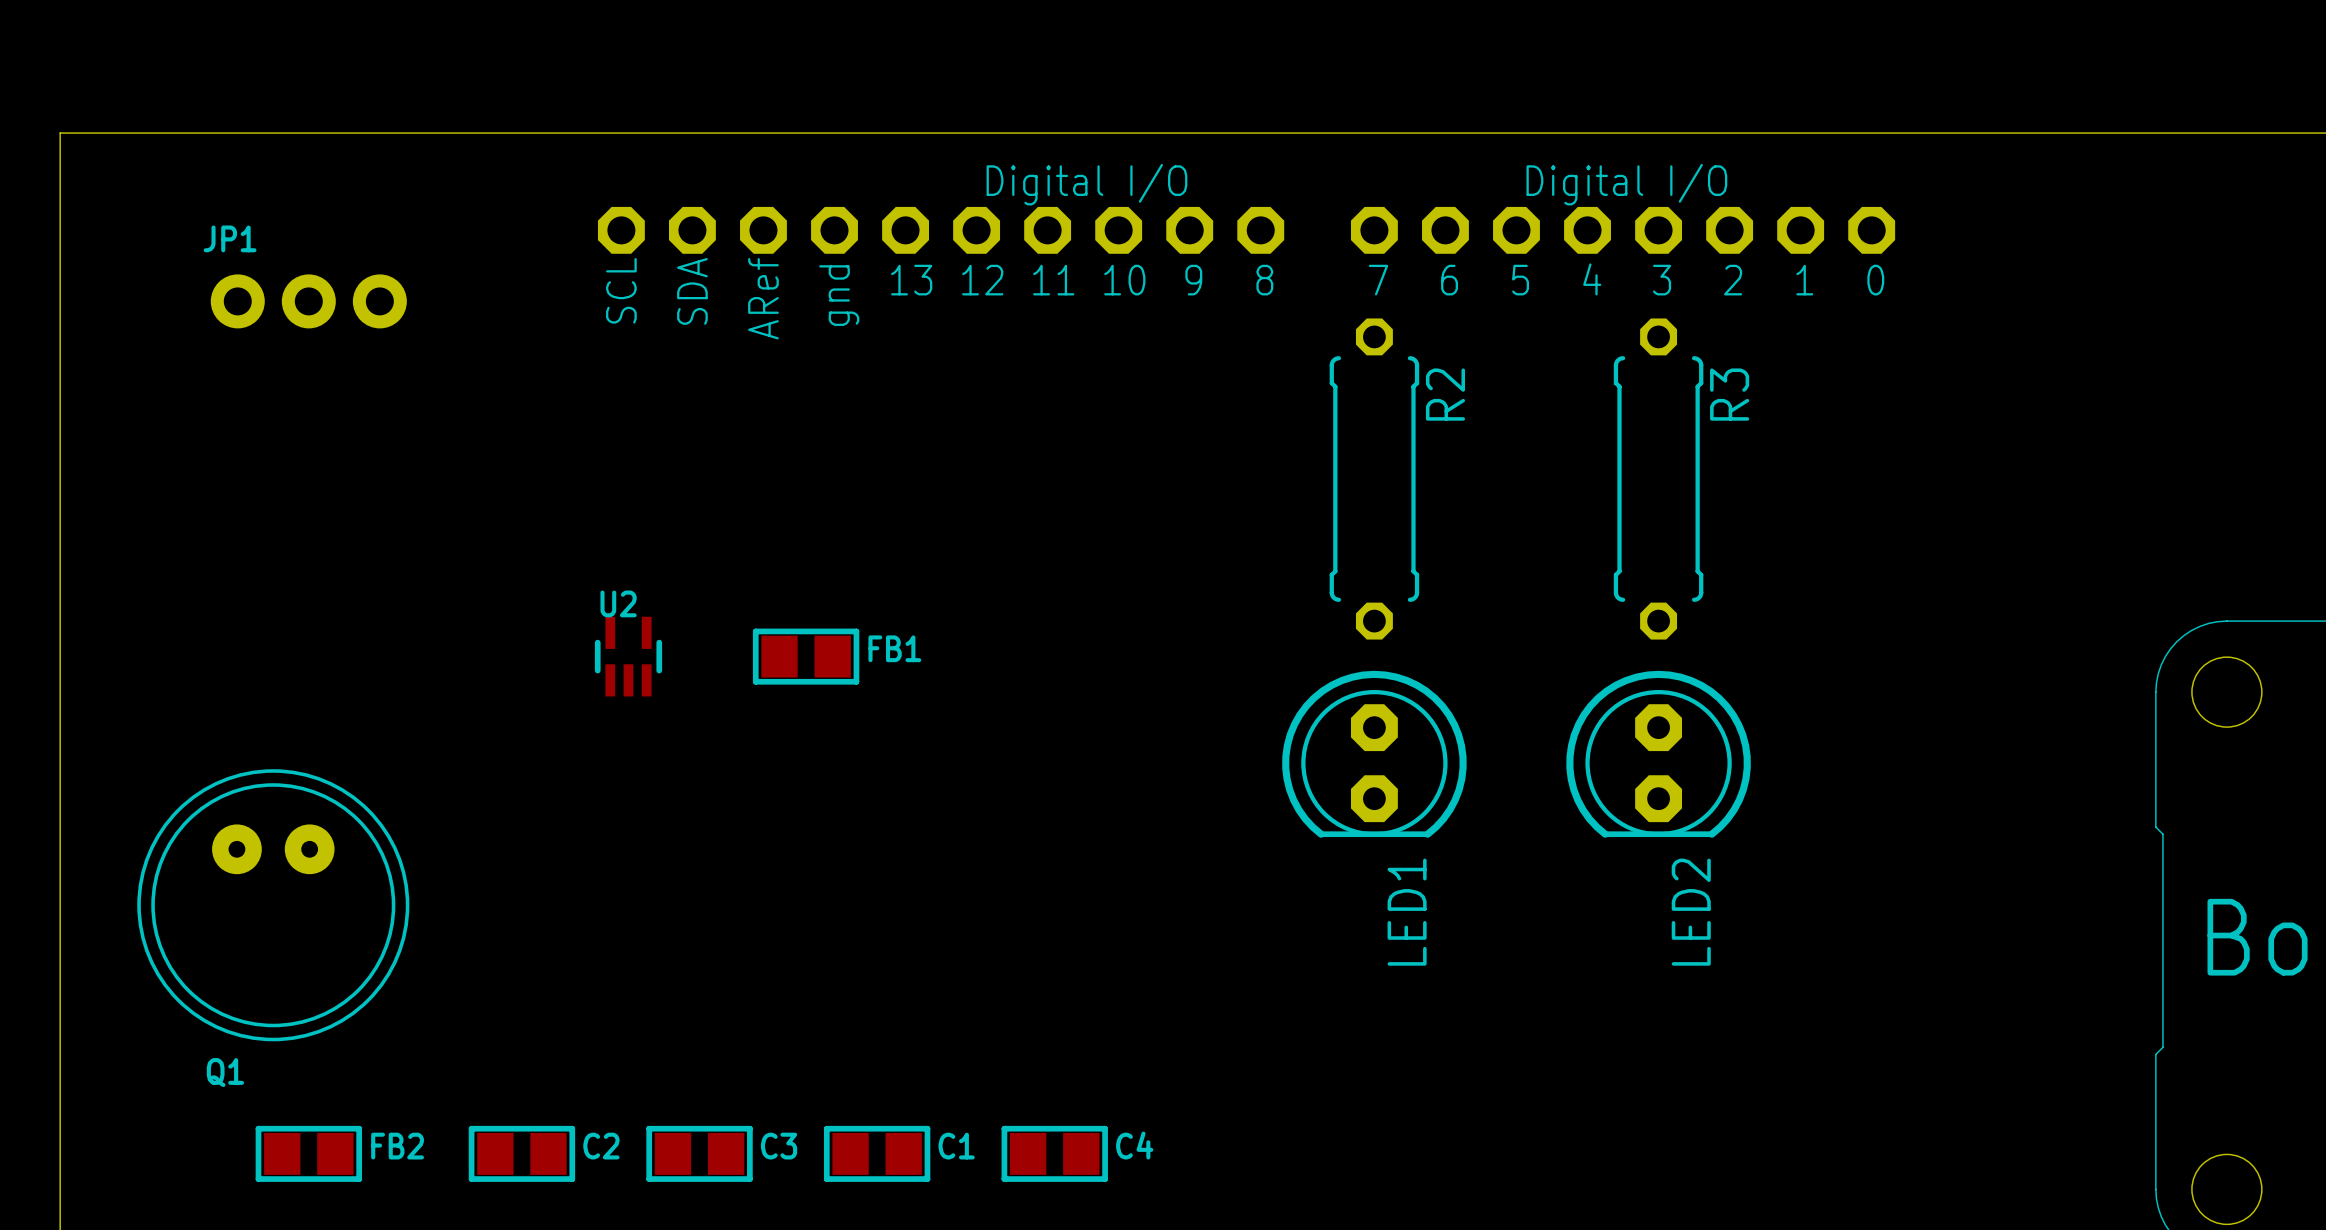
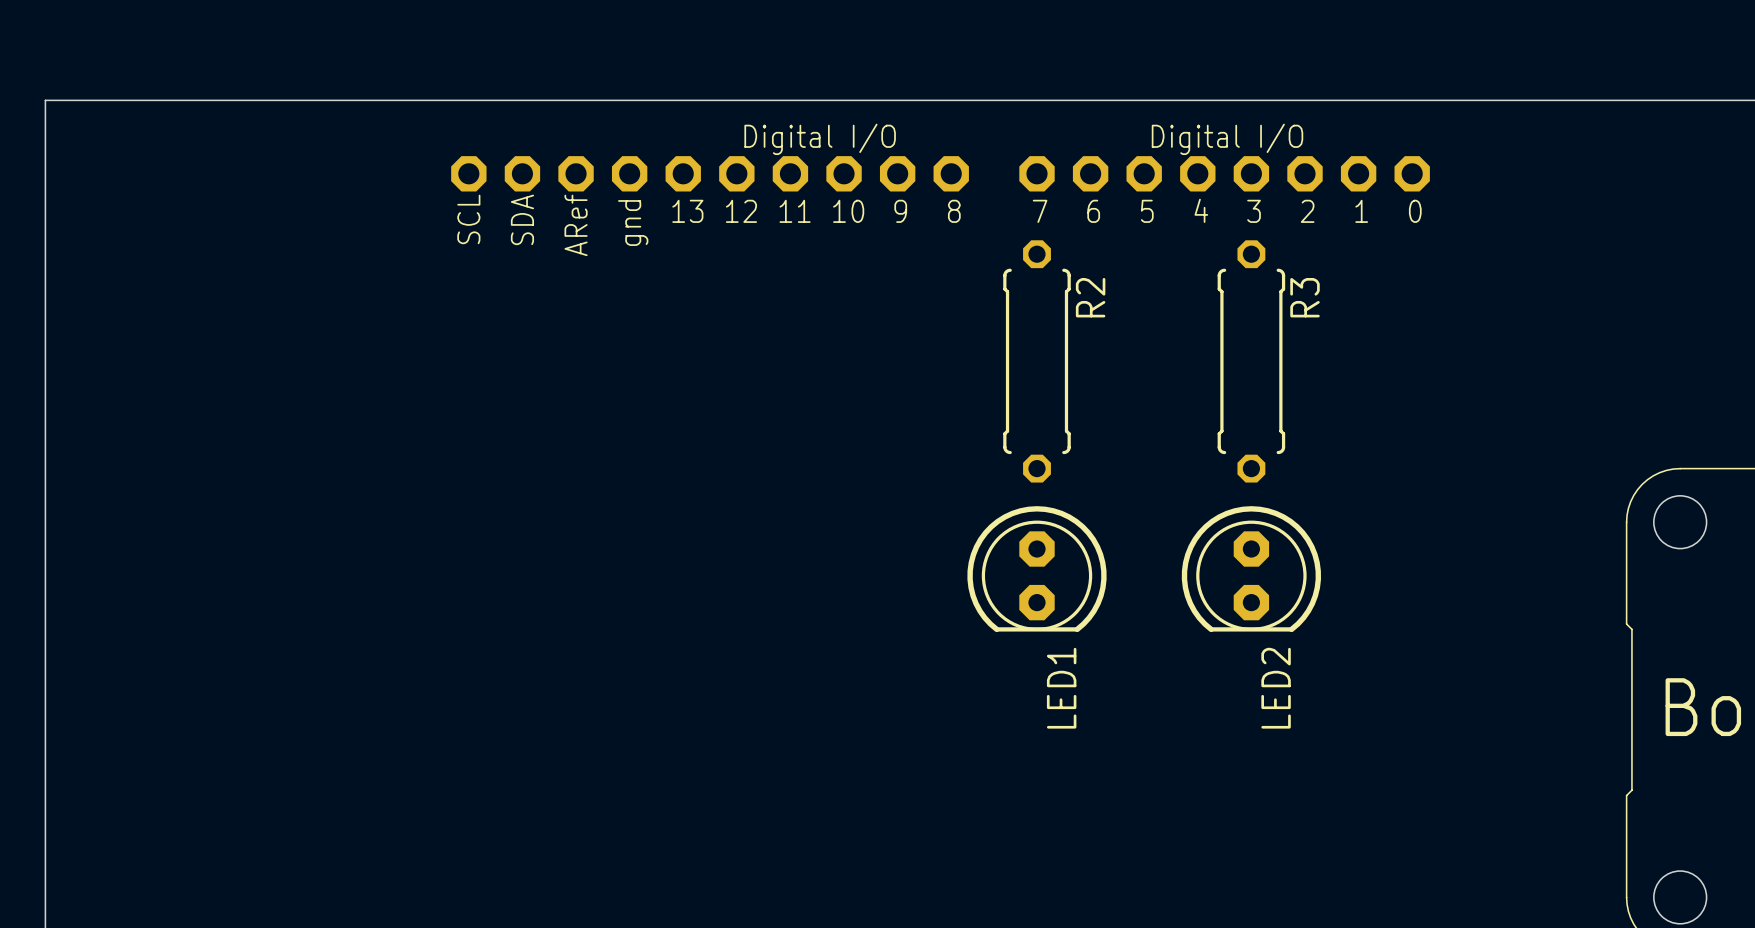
JP1: (308, 301) -> none
U2: (628, 656) -> none
FB1: (806, 656) -> none
Q1: (273, 905) -> none
FB2: (308, 1153) -> none
C2: (521, 1153) -> none
C3: (699, 1153) -> none
C1: (877, 1153) -> none
C4: (1054, 1153) -> none

